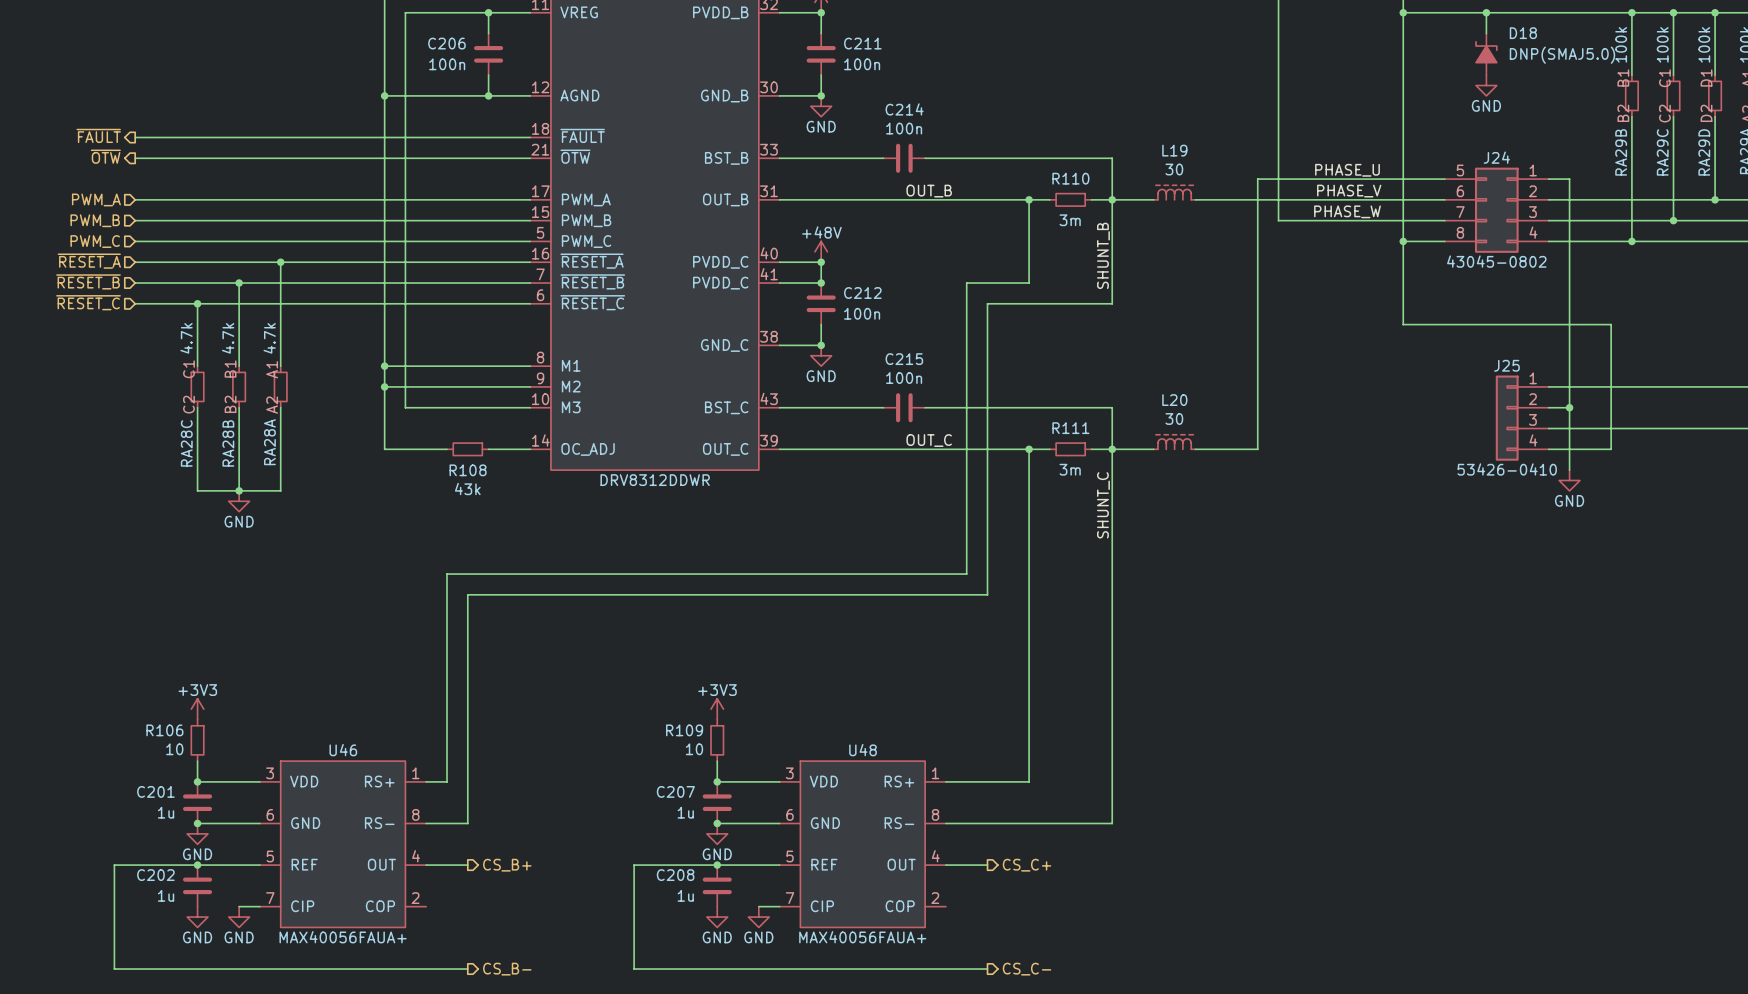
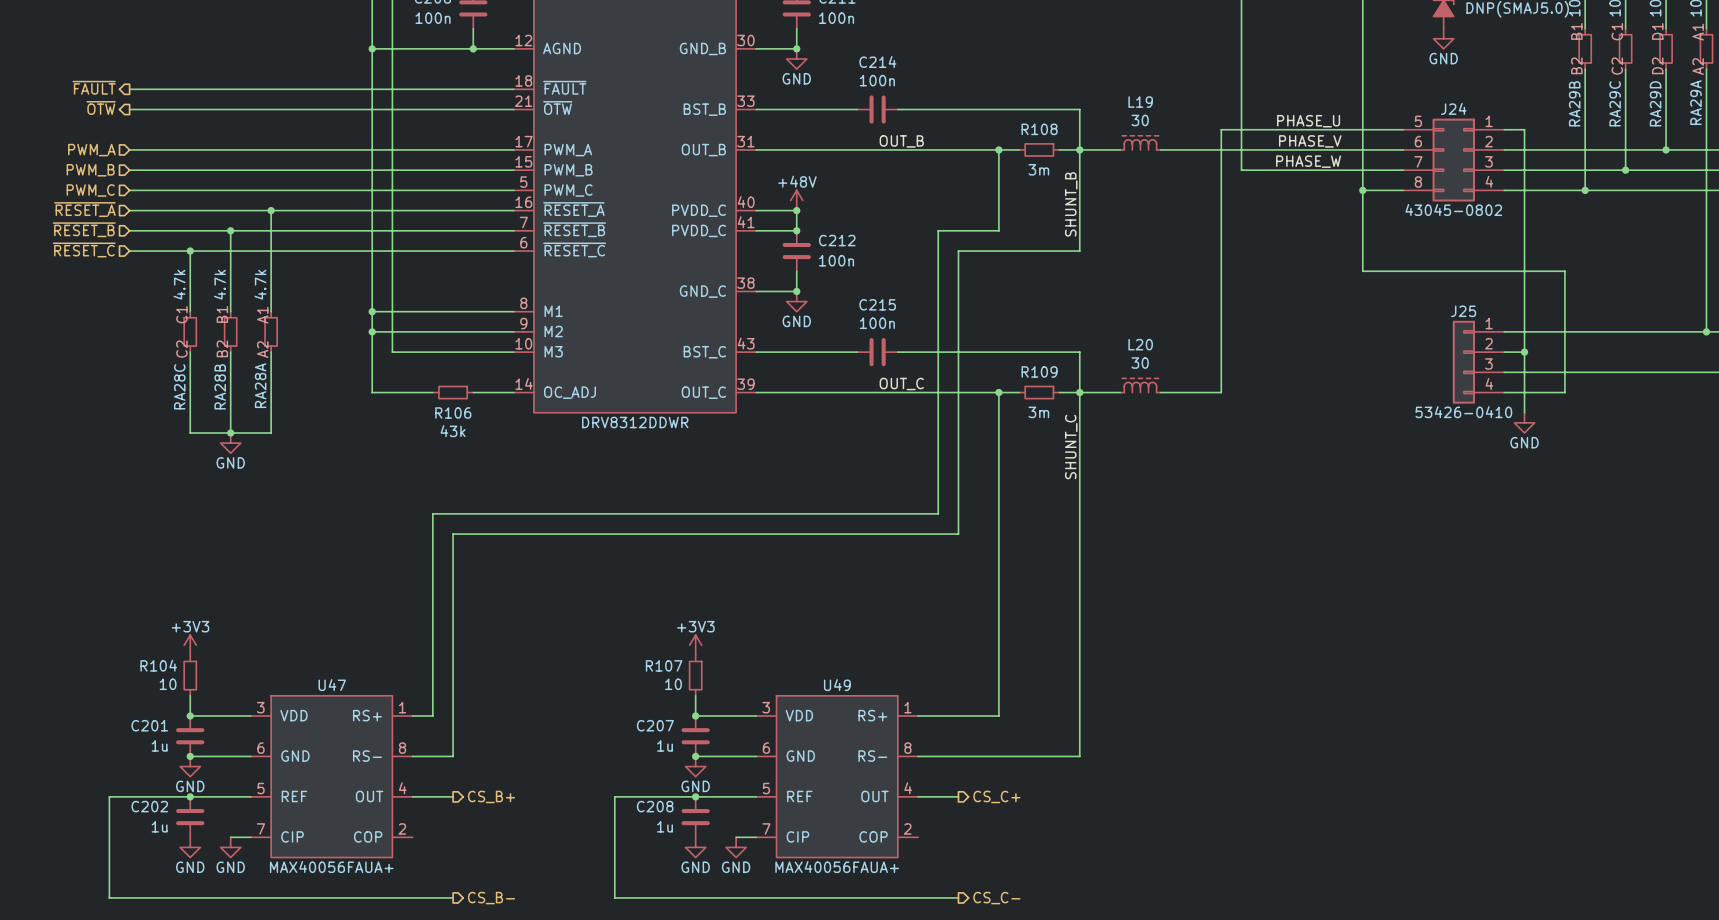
R110 name: R110 (1070, 178) -> R108 (1039, 129)
R111 name: R111 (1070, 428) -> R109 (1039, 371)
R108 name: R108 (468, 470) -> R106 (453, 412)
R106 name: R106 (164, 730) -> R104 (158, 665)
R109 name: R109 (684, 730) -> R107 (664, 665)
U46 name: U46 (343, 750) -> U47 (332, 685)
U48 name: U48 (863, 750) -> U49 (837, 685)

